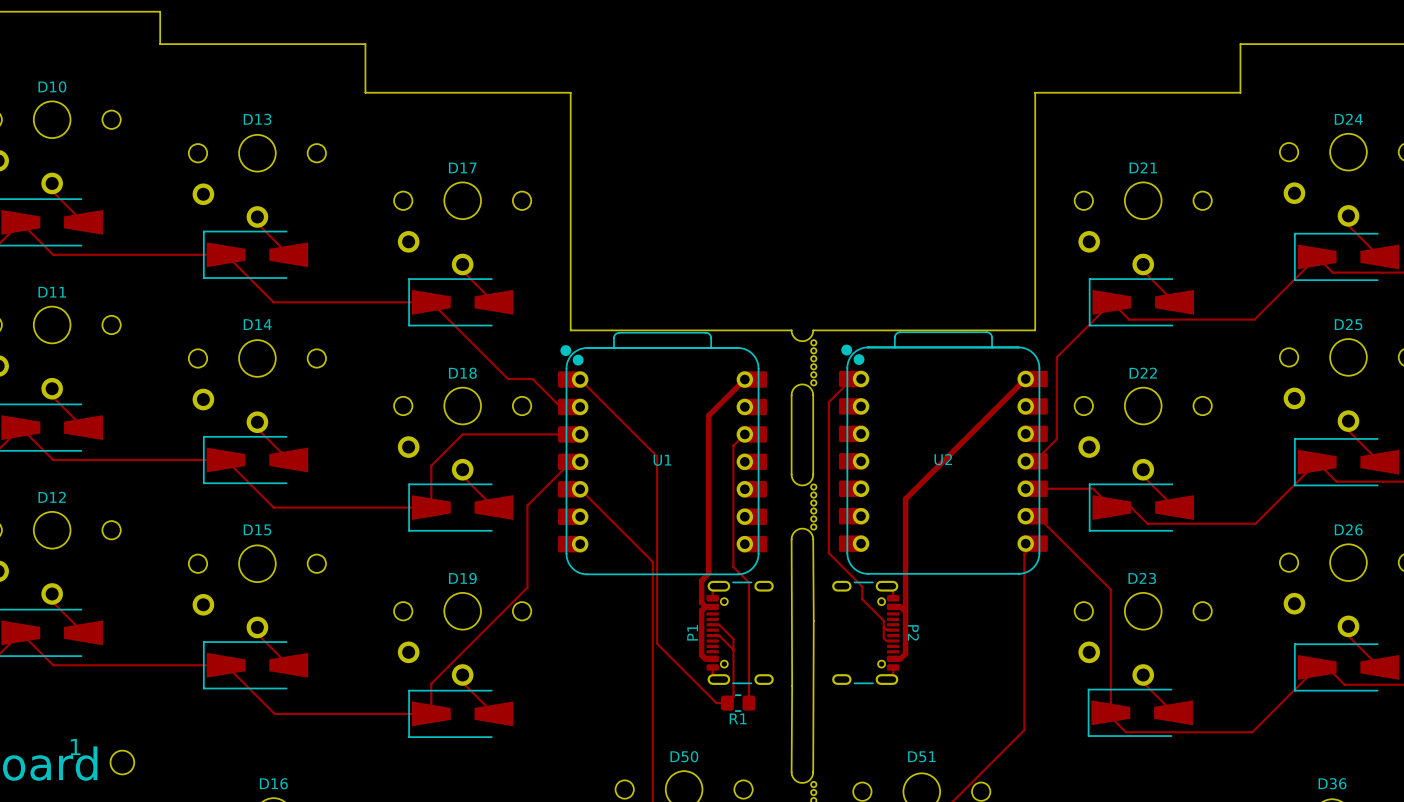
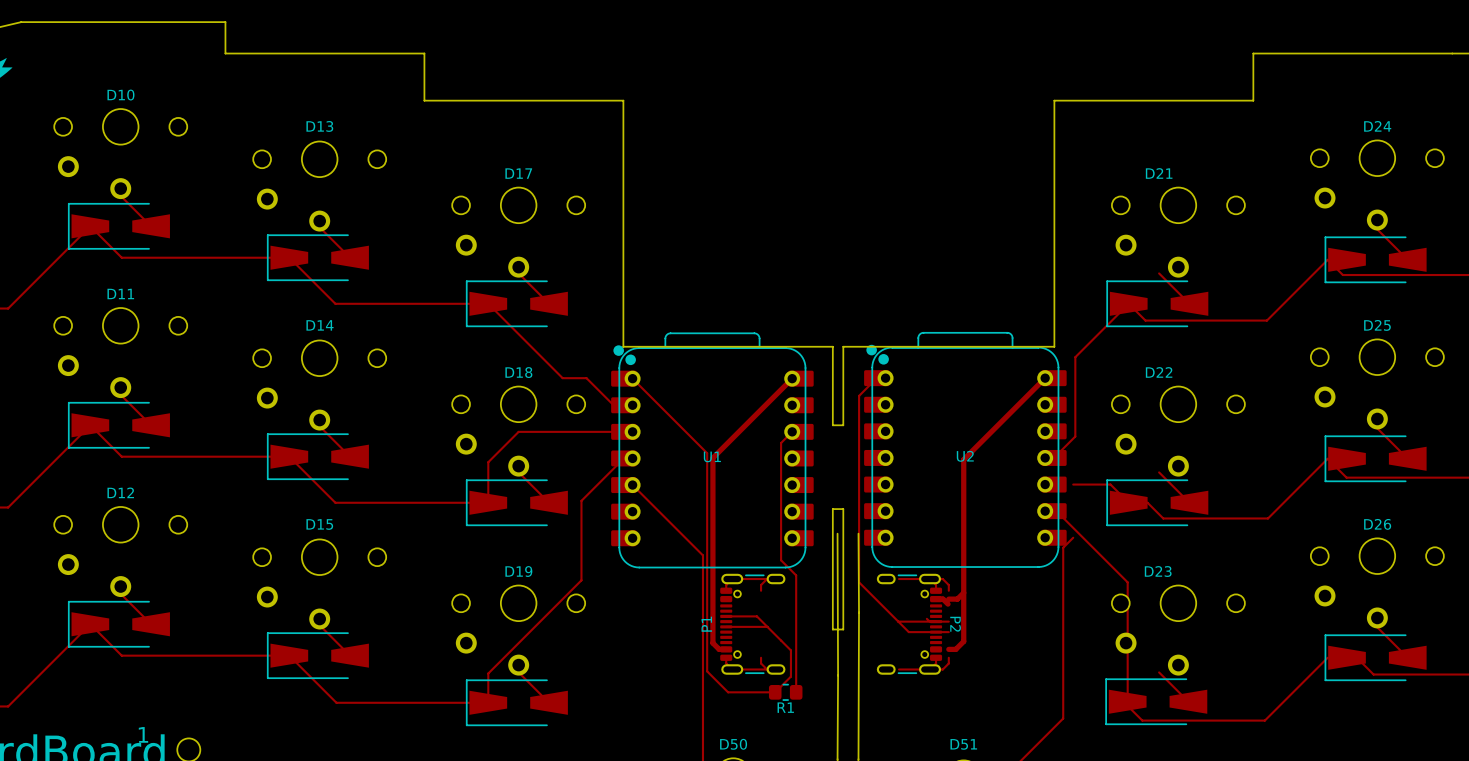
board edge: (1240, 44) (1240, 92) (1220, 92) -> (1272, 53) (1253, 53) (1253, 100)
board edge: (1035, 92) (1035, 330) (813, 330) -> (1073, 100) (1054, 100) (1054, 346) (843, 346) (843, 425) (832, 425) (832, 346) (623, 346) (623, 331)
track: (1143, 270) (1174, 302) -> (1159, 273) (1189, 303)
track: (1332, 272) (1317, 256) (1254, 319) (1234, 319) -> (1362, 275) (1342, 275) (1327, 259) (1266, 320)
D21 position: (1141, 302) -> (1157, 303)
track: (1129, 319) (1111, 302) (1056, 357) (1056, 439) (1034, 461) -> (1164, 320) (1145, 320) (1128, 303) (1075, 357) (1075, 436) (1053, 457)
board edge: (570, 330) (791, 330) -> none
part: (803, 362) -> none
track: (852, 379) (828, 402) (828, 553) (862, 586) (862, 599) (883, 620) (883, 638) (886, 640) -> (876, 378) (859, 395) (859, 582) (908, 632) (929, 632)
track: none -> (1045, 378) (963, 459) (963, 641) (955, 649) (948, 649)
track: (1025, 379) (905, 499) (905, 653) (900, 658) (893, 658) -> none
board edge: (791, 395) (791, 474) -> none
board edge: (813, 395) (813, 474) -> none
track: (708, 415) (708, 573) (701, 580) (701, 602) (705, 606) -> (757, 413) (712, 457) (712, 643) (719, 649) (726, 649)
U2 position: (943, 453) -> (965, 449)
track: (1143, 476) (1174, 507) -> (1159, 472) (1189, 502)
track: (1336, 481) (1317, 462) (1255, 523) (1235, 523) -> (1365, 477) (1346, 477) (1327, 458) (1268, 518)
track: (1073, 488) (1093, 488) (1111, 507) (1131, 507) (1147, 523) -> (1110, 484) (1128, 502) (1147, 502) (1163, 518) (1182, 518)
part: (803, 507) -> none
D22 position: (1141, 507) -> (1157, 502)
board edge: none -> (832, 509) (832, 629) (843, 629) (843, 509) (832, 509)
track: (1037, 516) (1110, 589) (1110, 712) -> (1056, 511) (1127, 582) (1127, 701)
track: none -> (776, 579) (732, 579) (726, 585) (726, 590)
track: none -> (899, 579) (942, 579) (948, 585) (948, 590)
track: none -> (963, 592) (957, 599) (948, 599)
track: (712, 606) (705, 606) (701, 610) (701, 654) (705, 658) (712, 658) -> none
track: none -> (726, 616) (756, 616) (767, 626)
track: (712, 624) (719, 624) (733, 639) (733, 696) -> (781, 640) (790, 650) (790, 676) (781, 686)
track: none -> (898, 621) (948, 621)
P1 position: (740, 632) -> (752, 624)
track: none -> (726, 626) (761, 626)
track: none -> (936, 632) (948, 632)
track: (657, 643) (716, 703) -> (707, 634) (707, 671) (728, 692) (764, 692)
track: none -> (726, 657) (726, 663) (732, 669) (776, 669)
track: none -> (948, 657) (948, 663) (942, 669) (899, 669)
track: (1317, 667) (1252, 732) (1232, 732) -> (1327, 657) (1264, 720)
track: (1143, 682) (1173, 712) -> (1159, 672) (1188, 701)
track: (1106, 712) (1125, 732) -> (1123, 701) (1142, 720) (1161, 720)
D23 position: (1140, 712) -> (1156, 701)

